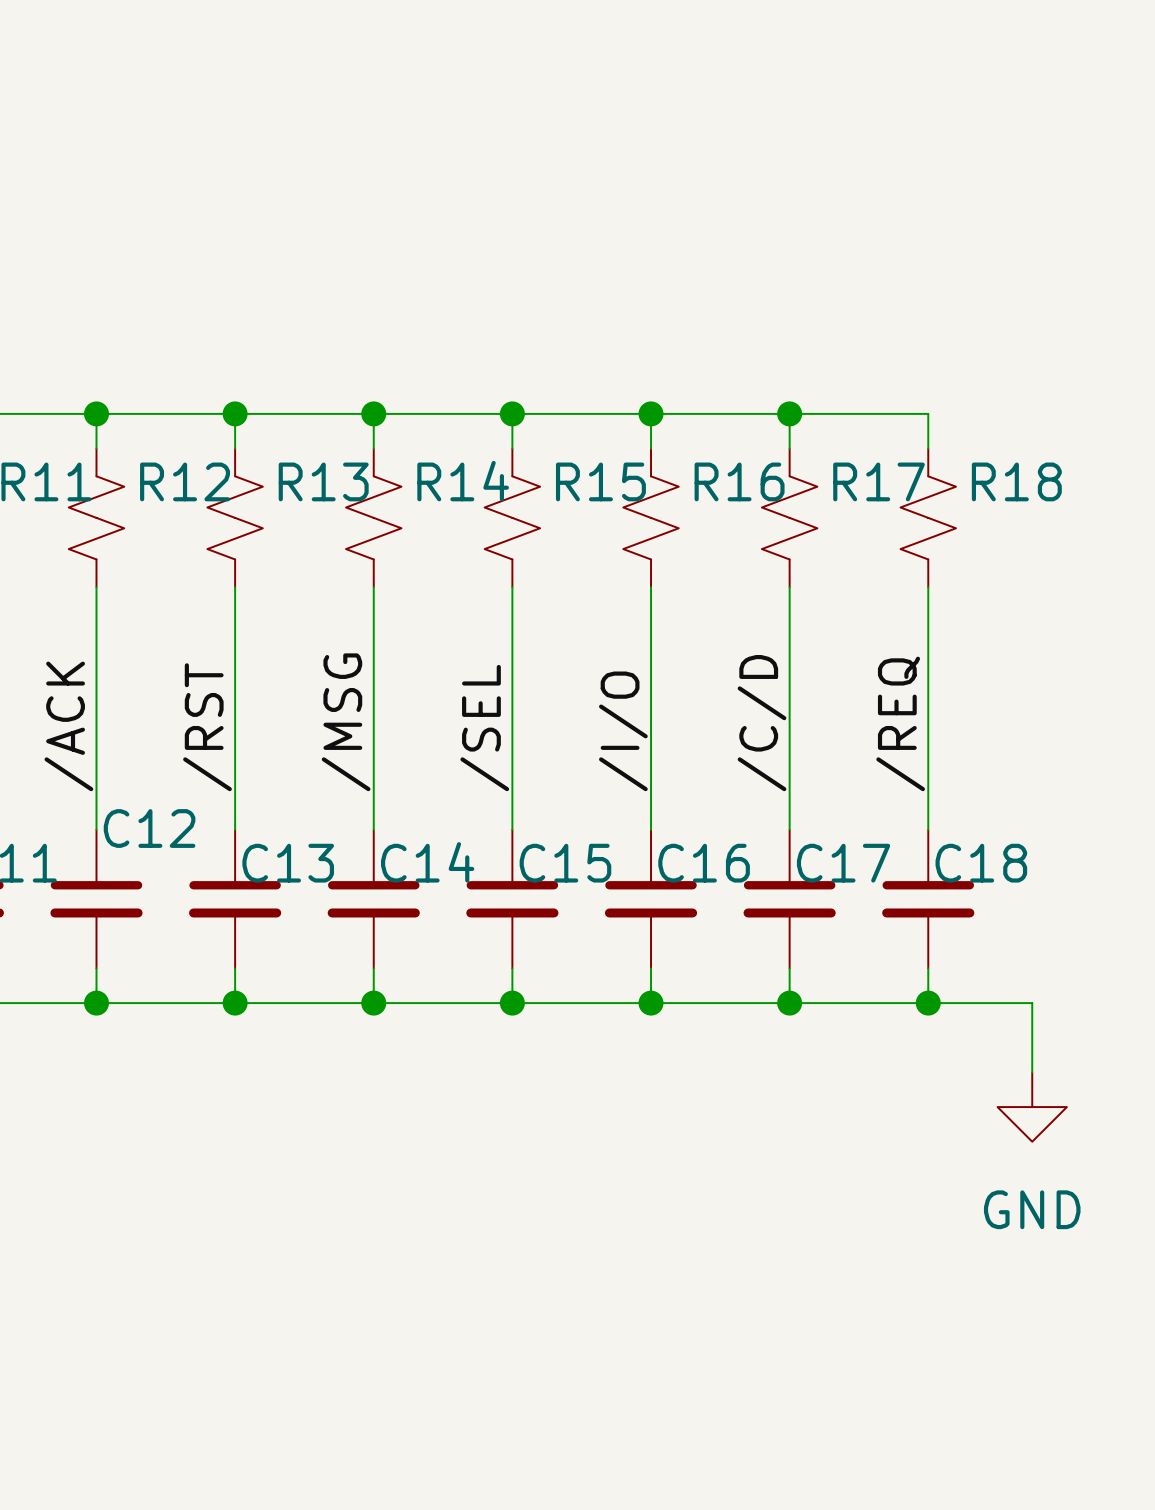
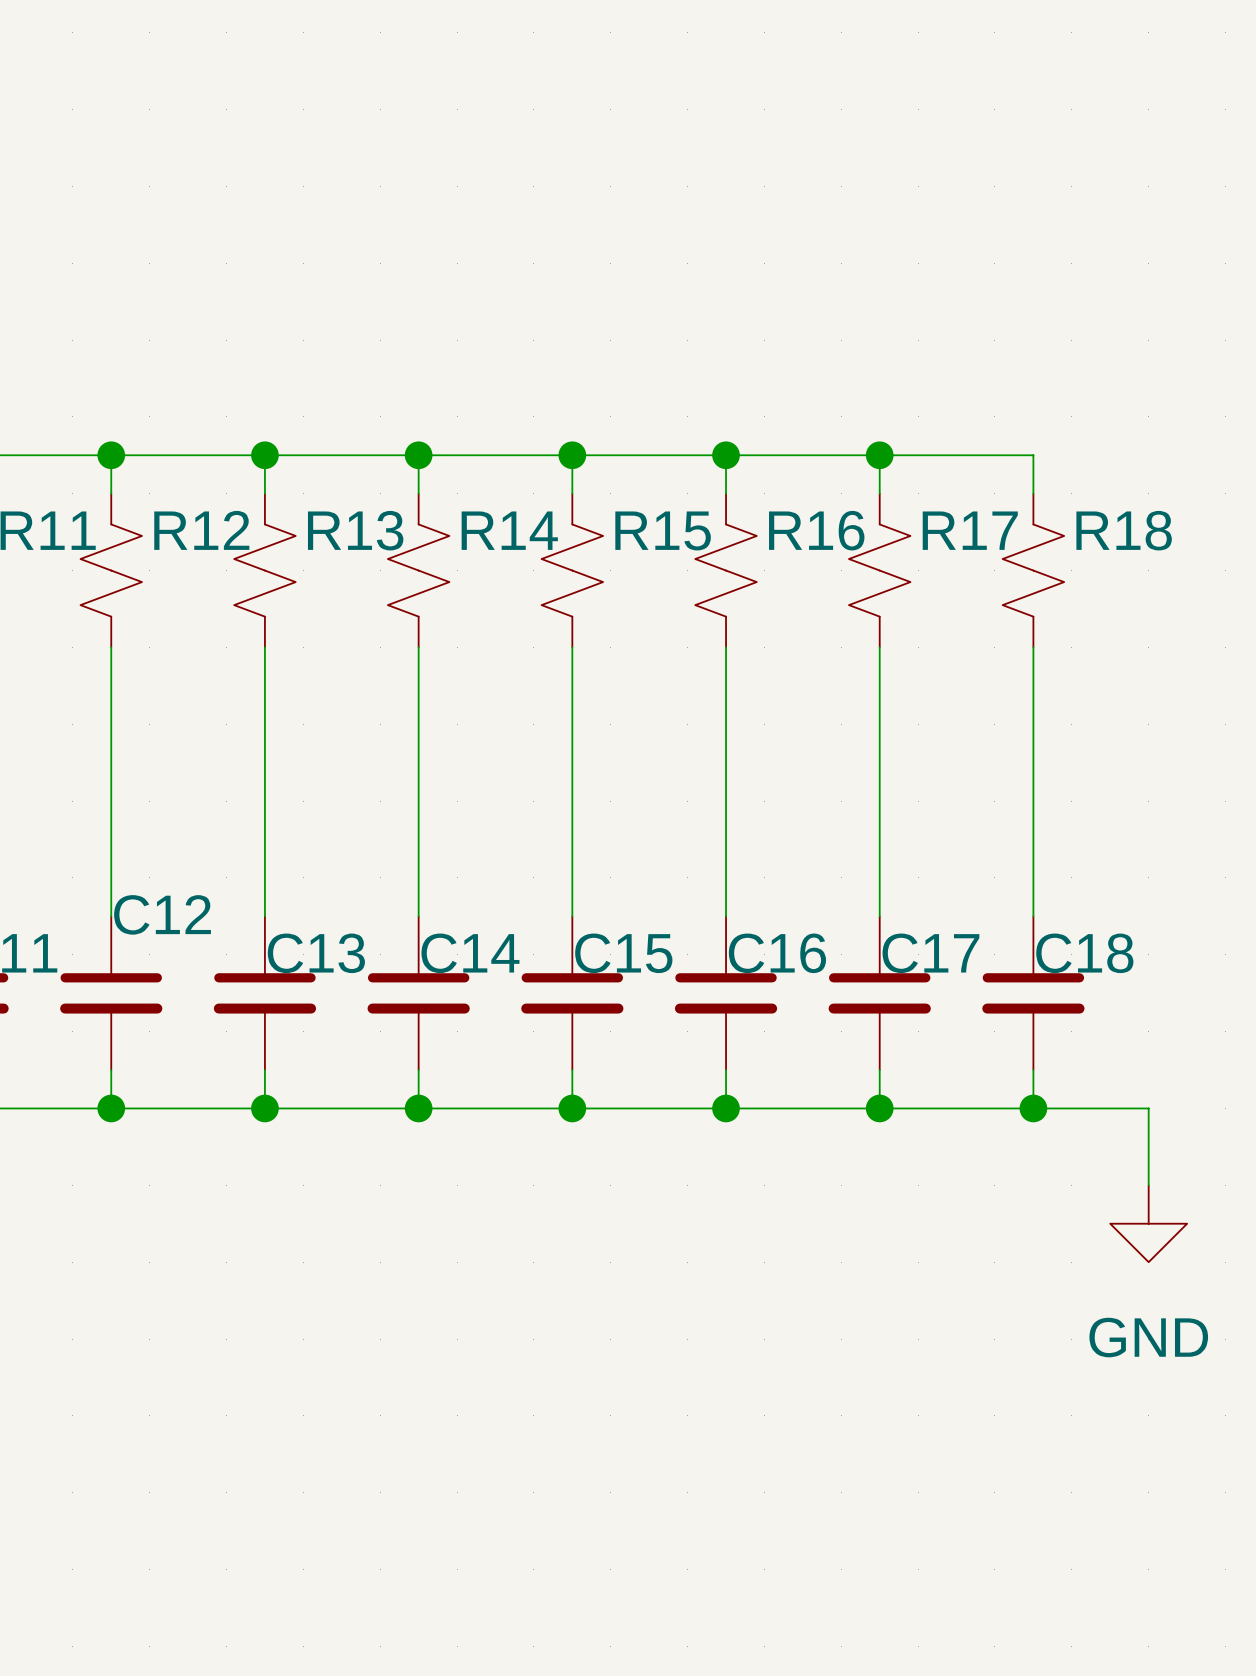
label: /MSG (346, 722) -> none
label: /C/D (762, 723) -> none
label: /REQ (900, 723) -> none
label: /ACK (68, 726) -> none
label: /RST (207, 727) -> none
label: /SEL (484, 728) -> none
label: /I/O (623, 731) -> none

